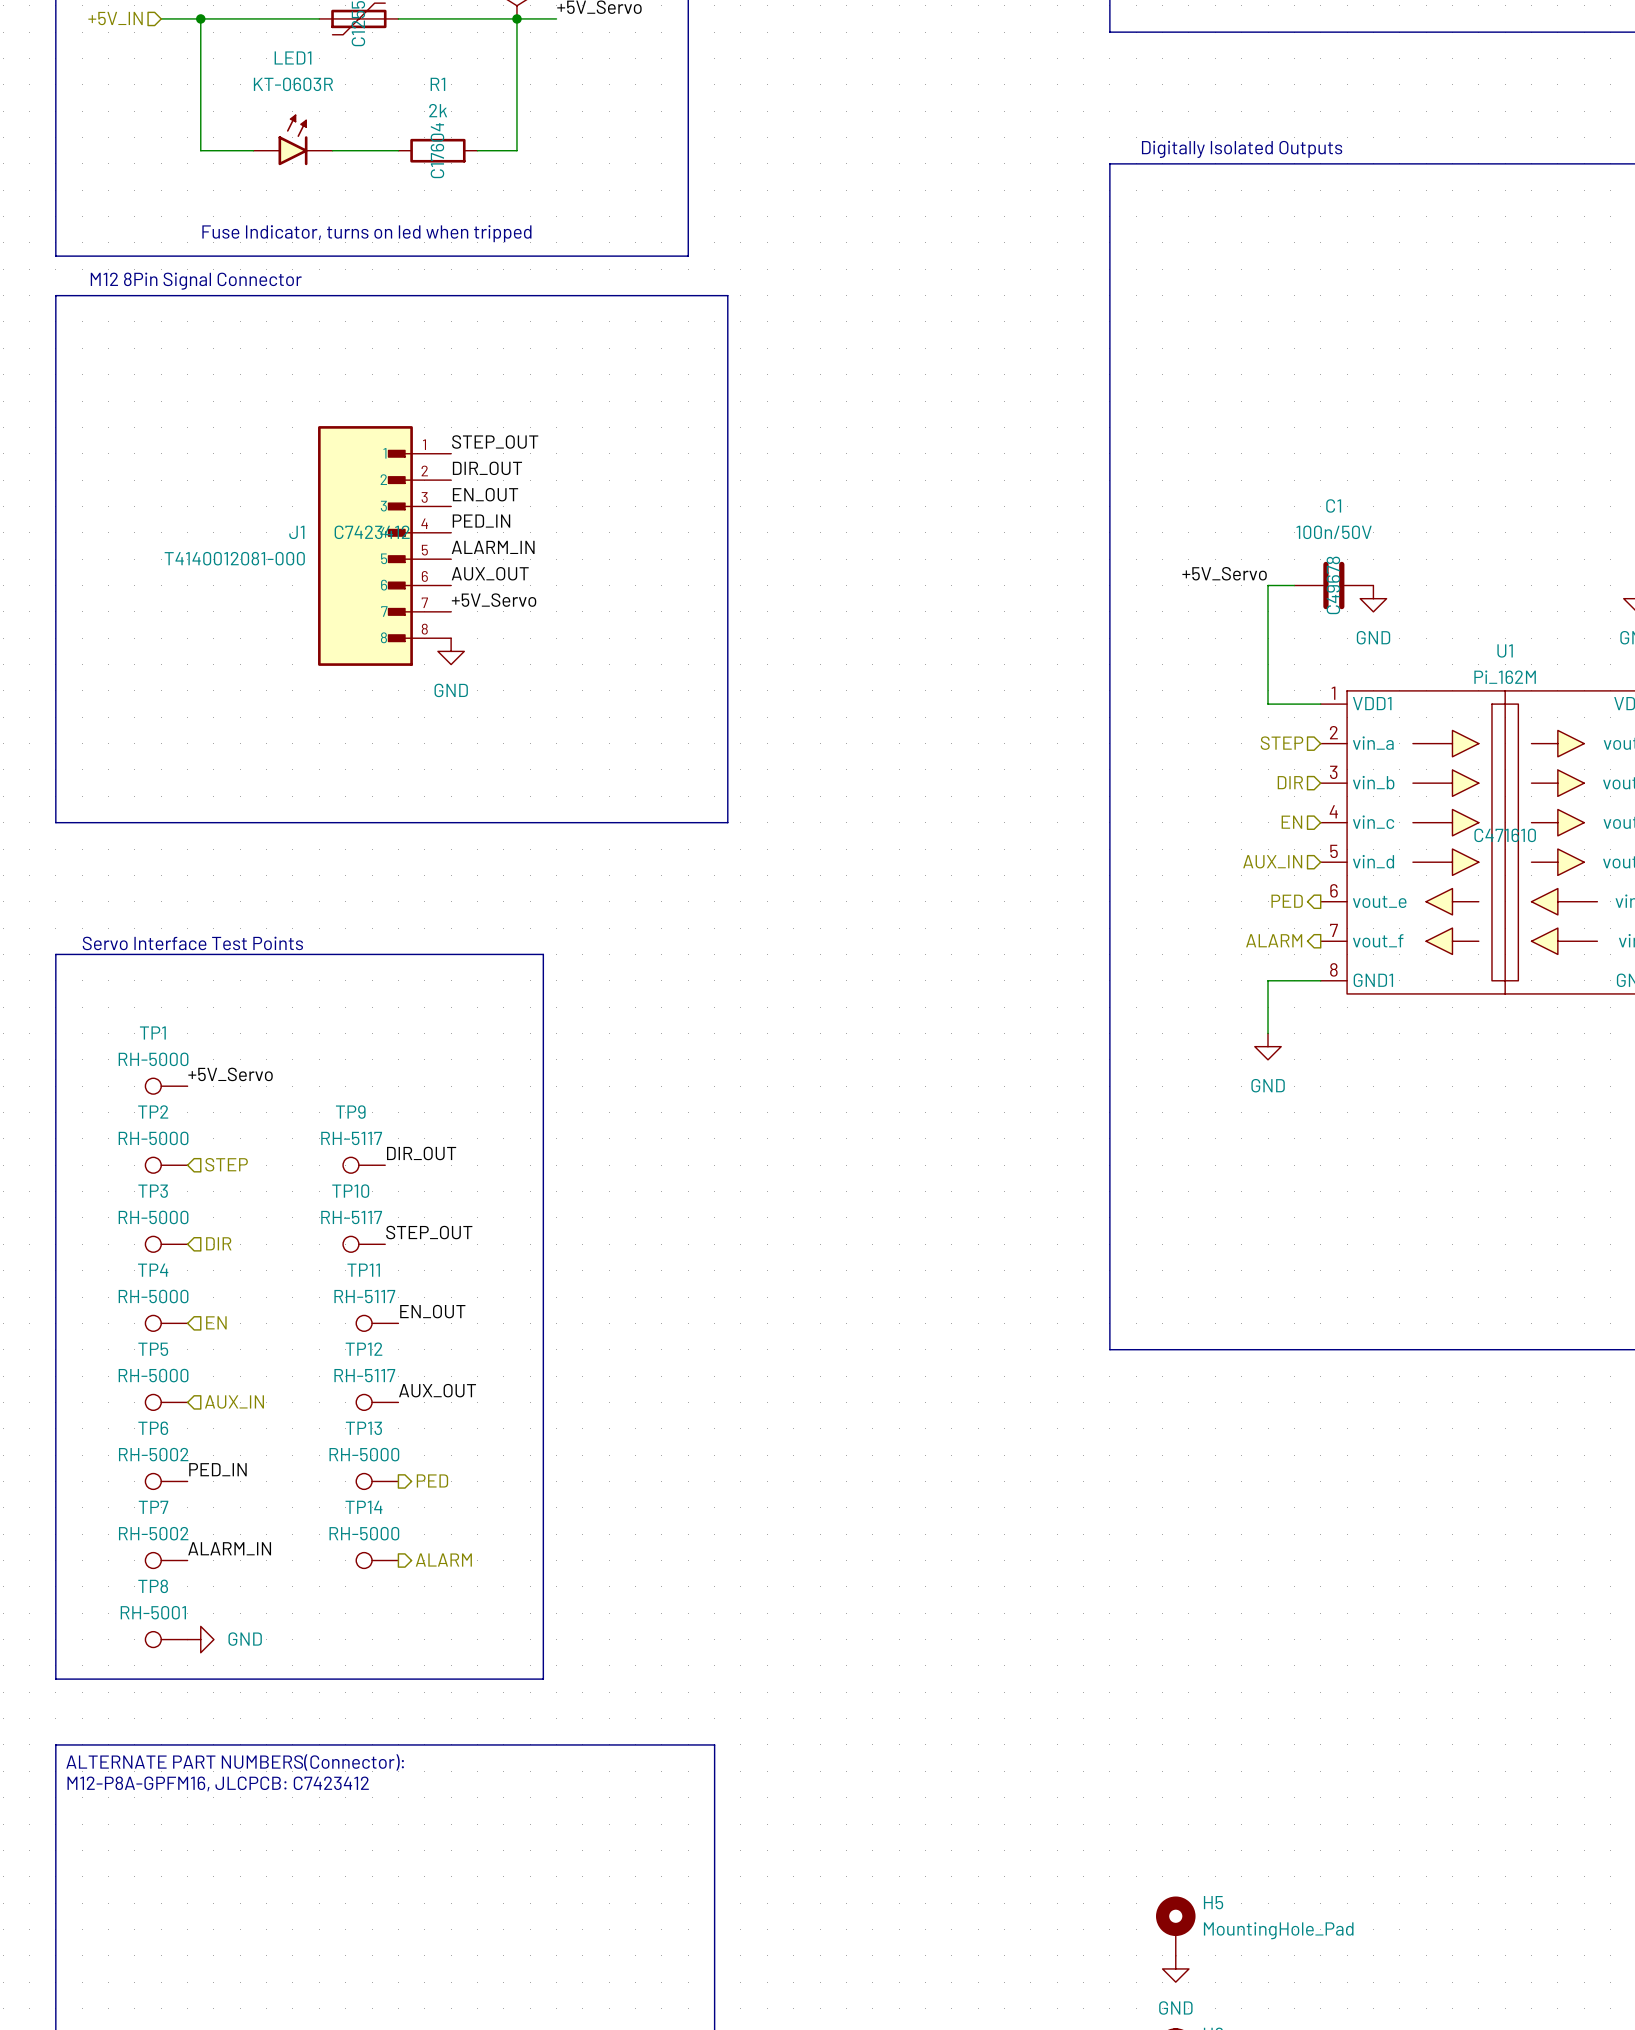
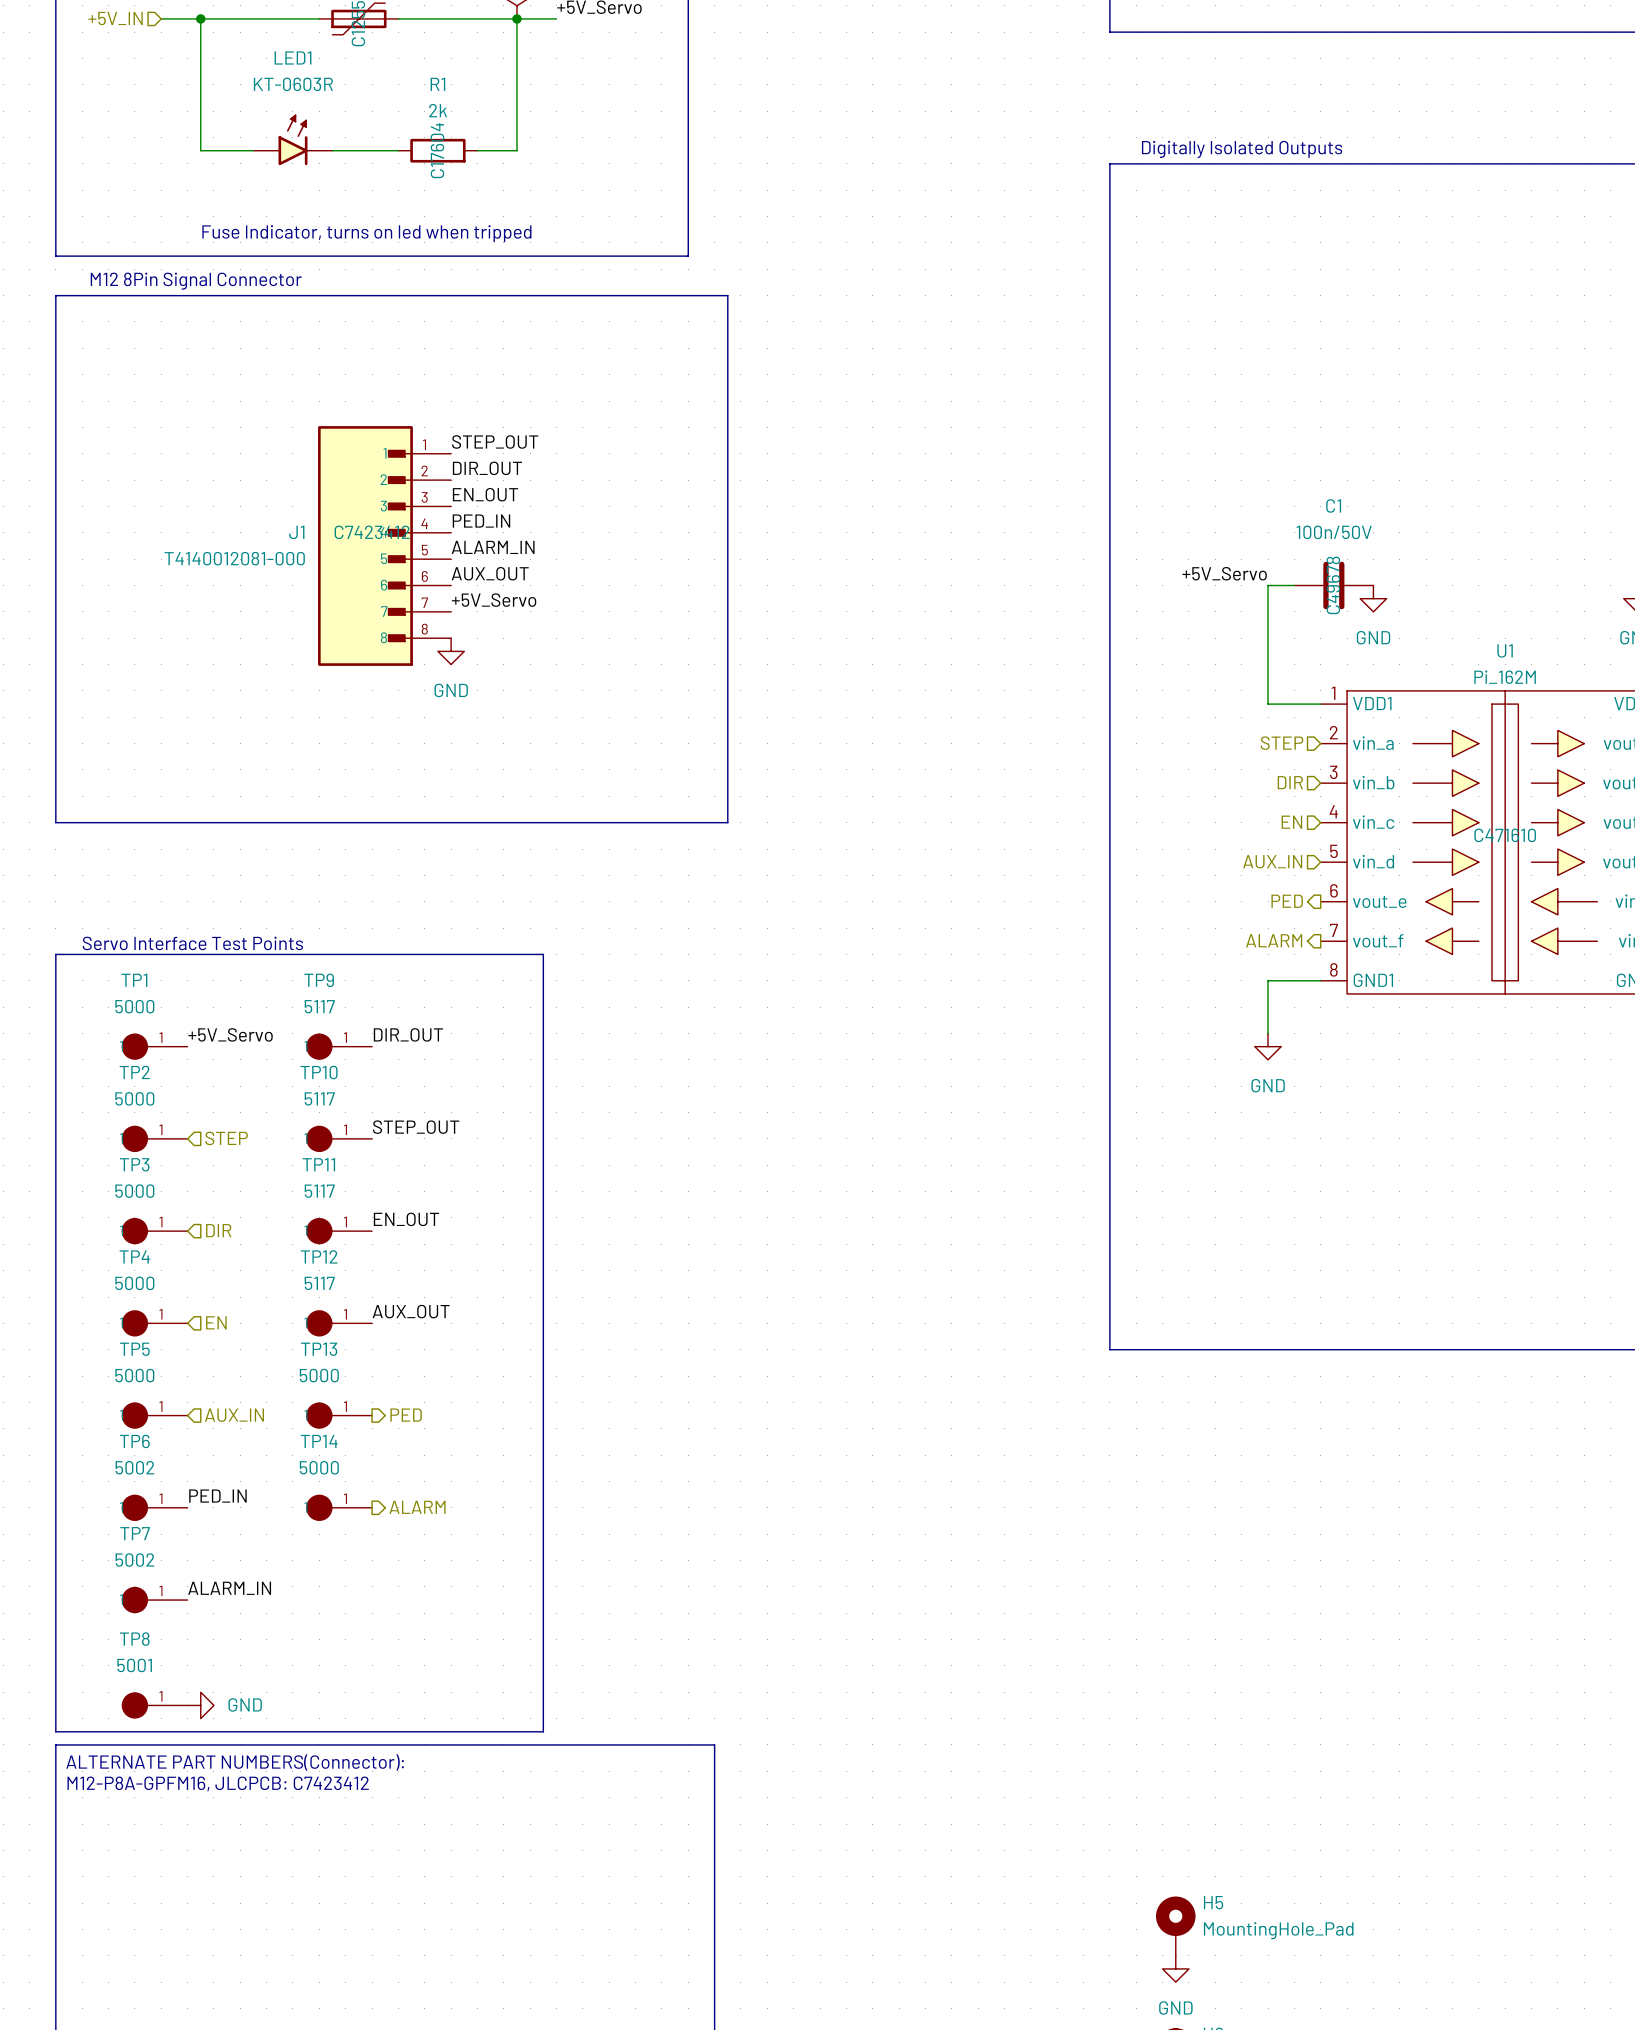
TP1 value: RH-5000 (153, 1059) -> 5000 (134, 1006)
label position: +5V_Servo (230, 1074) -> +5V_Servo (230, 1034)
TP1 symbol: [145, 1078, 188, 1095] -> [121, 1033, 188, 1060]
TP2 value: RH-5000 (153, 1138) -> 5000 (134, 1098)
TP9 value: RH-5117 (351, 1138) -> 5117 (319, 1006)
label position: DIR_OUT (421, 1153) -> DIR_OUT (408, 1034)
TP2 symbol: [145, 1157, 188, 1174] -> [121, 1125, 188, 1153]
TP9 symbol: [343, 1157, 386, 1174] -> [306, 1033, 373, 1060]
hierarchical label position: STEP (226, 1164) -> STEP (226, 1138)
TP3 value: RH-5000 (153, 1217) -> 5000 (134, 1191)
TP10 value: RH-5117 (351, 1217) -> 5117 (319, 1098)
label position: STEP_OUT (429, 1232) -> STEP_OUT (416, 1127)
TP3 symbol: [145, 1236, 188, 1253] -> [121, 1217, 188, 1245]
TP10 symbol: [343, 1236, 386, 1253] -> [306, 1125, 373, 1153]
hierarchical label position: DIR (218, 1243) -> DIR (218, 1230)
TP4 value: RH-5000 (153, 1296) -> 5000 (134, 1283)
TP11 value: RH-5117 (364, 1296) -> 5117 (319, 1191)
label position: EN_OUT (432, 1311) -> EN_OUT (406, 1219)
TP4 symbol: [145, 1315, 188, 1332] -> [121, 1310, 188, 1337]
TP11 symbol: [356, 1315, 399, 1332] -> [306, 1217, 373, 1245]
TP5 value: RH-5000 (153, 1375) -> 5000 (134, 1375)
TP12 value: RH-5117 (364, 1375) -> 5117 (319, 1283)
label position: AUX_OUT (437, 1390) -> AUX_OUT (411, 1311)
TP5 symbol: [145, 1394, 188, 1411] -> [121, 1402, 188, 1429]
TP12 symbol: [356, 1394, 399, 1411] -> [306, 1310, 373, 1337]
hierarchical label position: AUX_IN (234, 1401) -> AUX_IN (234, 1415)
TP6 value: RH-5002 (153, 1454) -> 5002 (134, 1467)
TP13 value: RH-5000 (364, 1454) -> 5000 (319, 1375)
label position: PED_IN (217, 1469) -> PED_IN (217, 1496)
TP6 symbol: [145, 1473, 188, 1490] -> [121, 1494, 188, 1521]
TP13 symbol: [356, 1473, 399, 1490] -> [306, 1402, 373, 1429]
hierarchical label position: PED (432, 1480) -> PED (406, 1415)
TP7 value: RH-5002 (153, 1533) -> 5002 (134, 1560)
TP14 value: RH-5000 (364, 1533) -> 5000 (319, 1467)
label position: ALARM_IN (229, 1548) -> ALARM_IN (229, 1588)
TP7 symbol: [145, 1552, 188, 1569] -> [121, 1586, 188, 1614]
TP14 symbol: [356, 1552, 399, 1569] -> [306, 1494, 373, 1521]
hierarchical label position: ALARM (443, 1560) -> ALARM (417, 1507)
TP8 value: RH-5001 (153, 1612) -> 5001 (134, 1665)
TP8 symbol: [145, 1631, 188, 1648] -> [121, 1692, 188, 1719]
power symbol position: GND (200, 1639) -> GND (200, 1705)
line: (55, 1679) (543, 1679) -> (55, 1679) (55, 1731) (543, 1731) (543, 1679)

